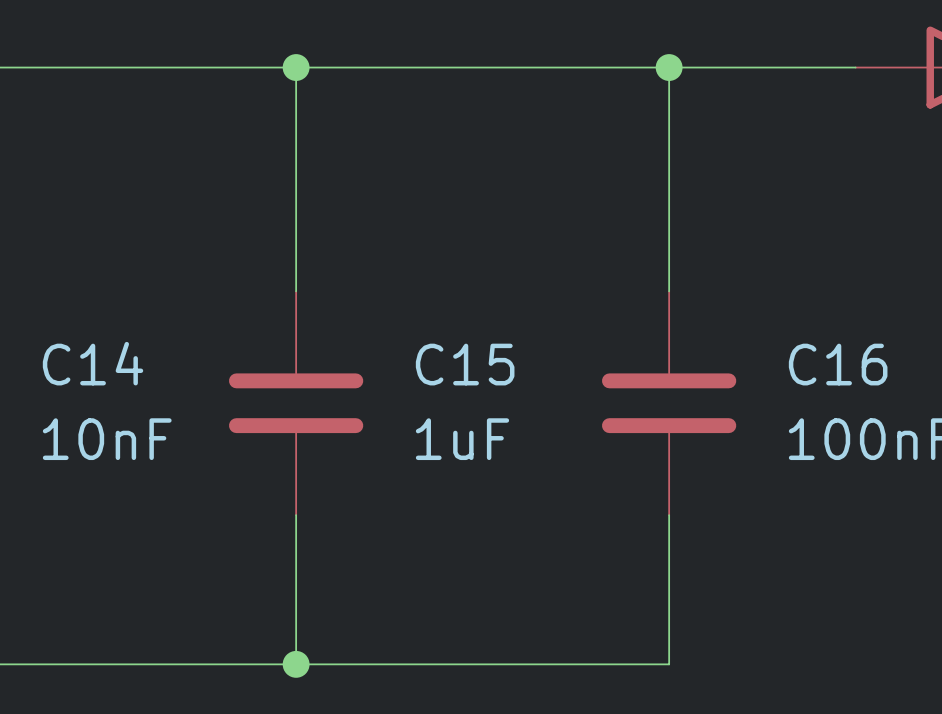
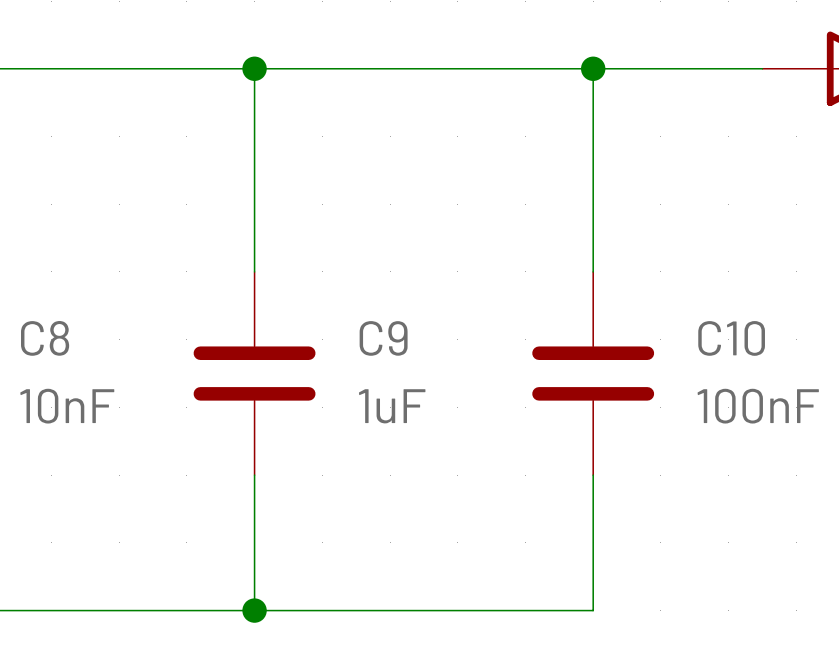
C14 name: C14 (93, 363) -> C8 (45, 338)
C15 name: C15 (465, 364) -> C9 (383, 338)
C16 name: C16 (838, 364) -> C10 (731, 338)

